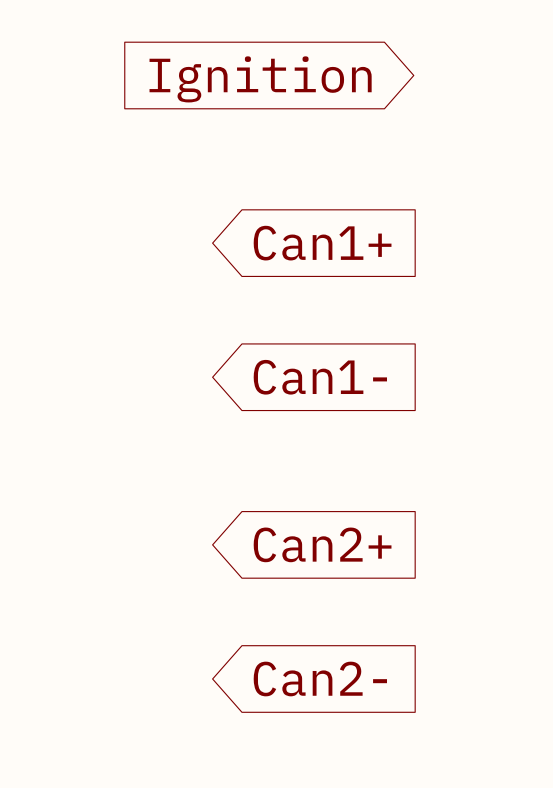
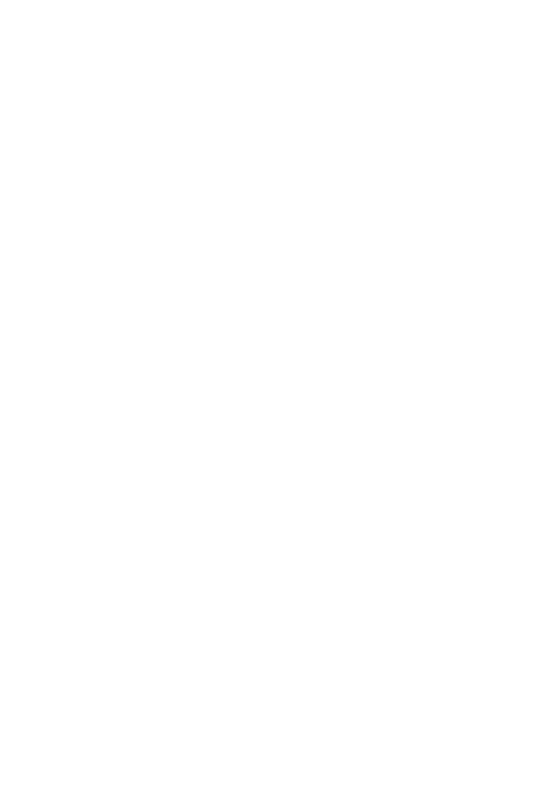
global label: Ignition (260, 79) -> none
global label: Can1+ (322, 243) -> none
global label: Can1- (320, 377) -> none
global label: Can2+ (322, 544) -> none
global label: Can2- (320, 678) -> none

